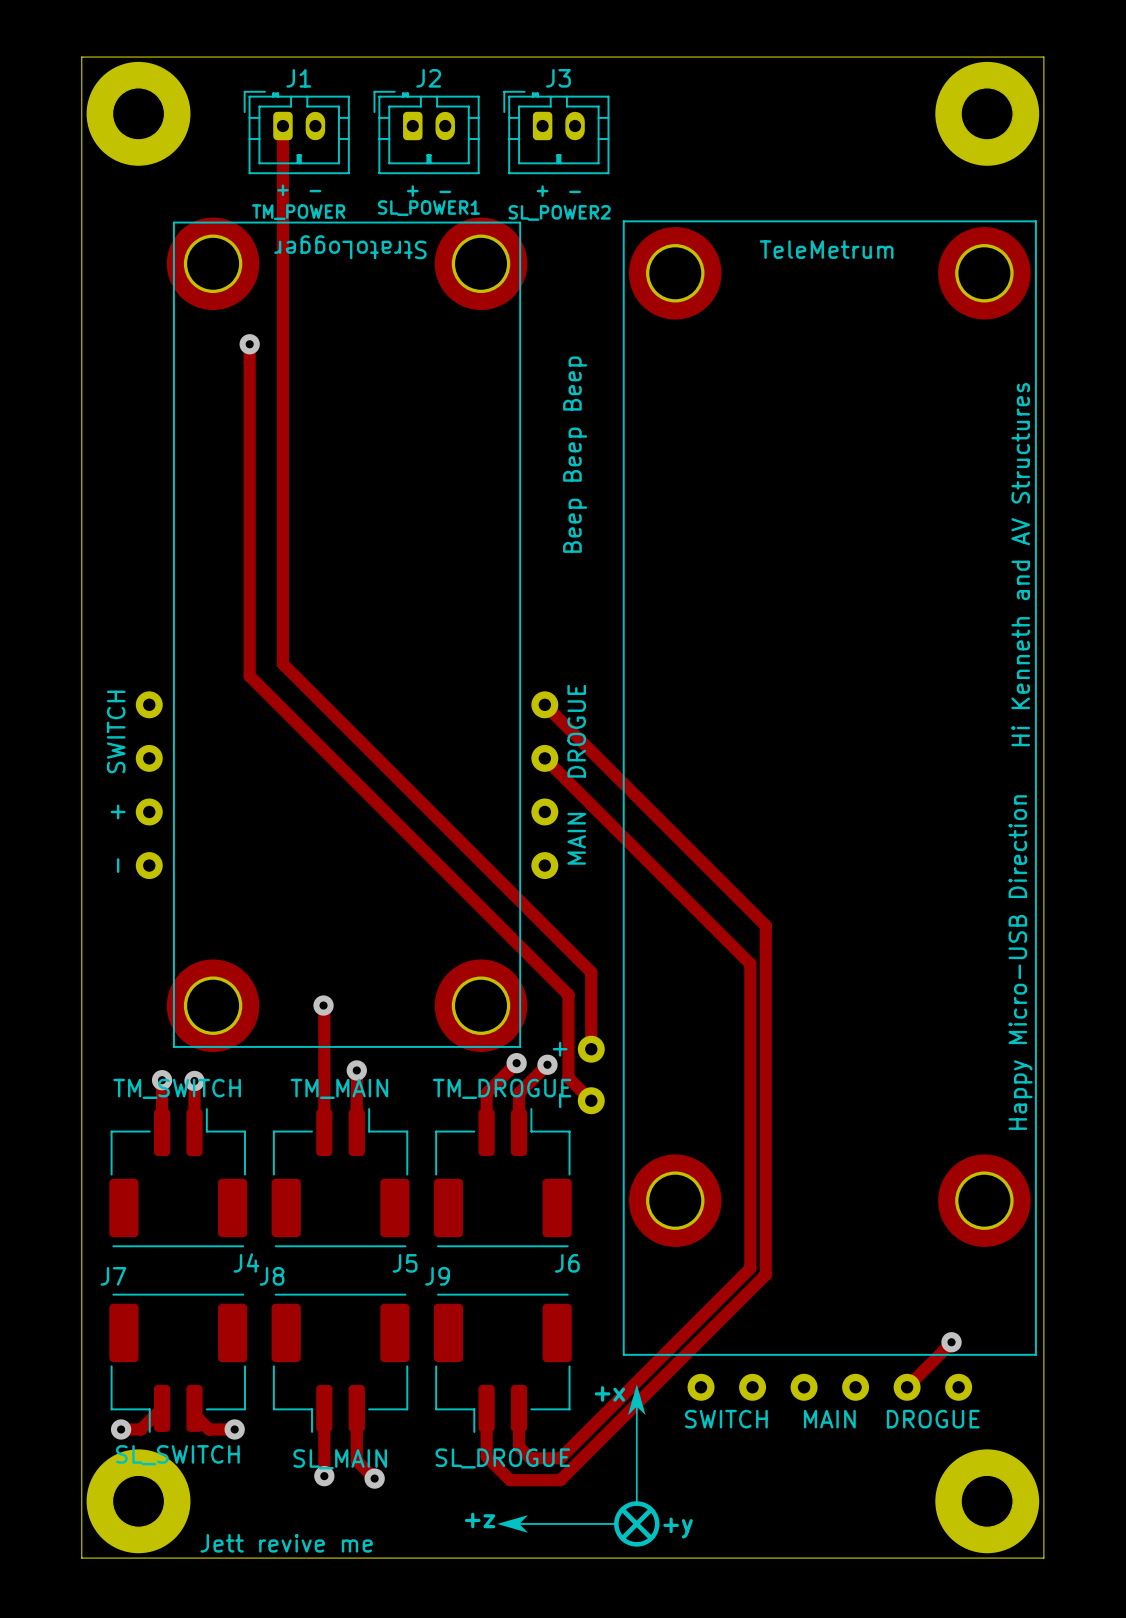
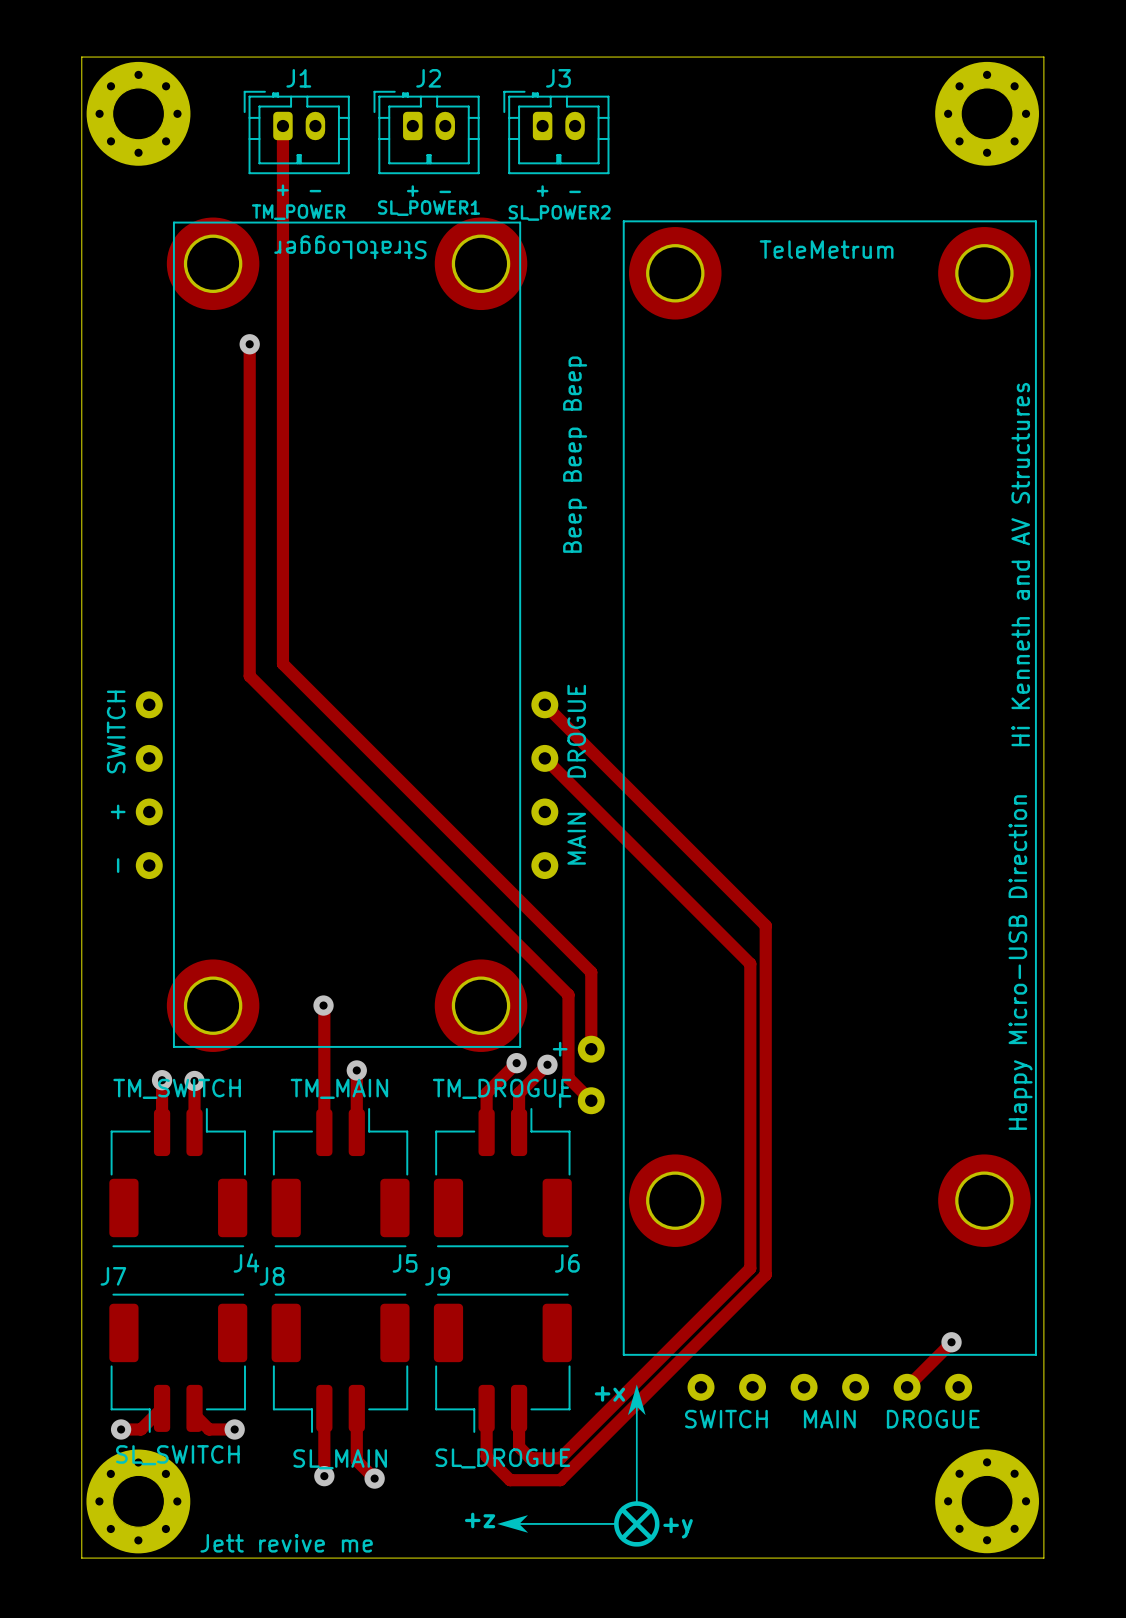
part footprint: [86, 61, 191, 166] -> [86, 61, 191, 166]
part footprint: [935, 61, 1040, 166] -> [935, 61, 1040, 166]
part footprint: [86, 1449, 191, 1554] -> [86, 1449, 191, 1554]
part footprint: [935, 1449, 1040, 1554] -> [935, 1449, 1040, 1554]

